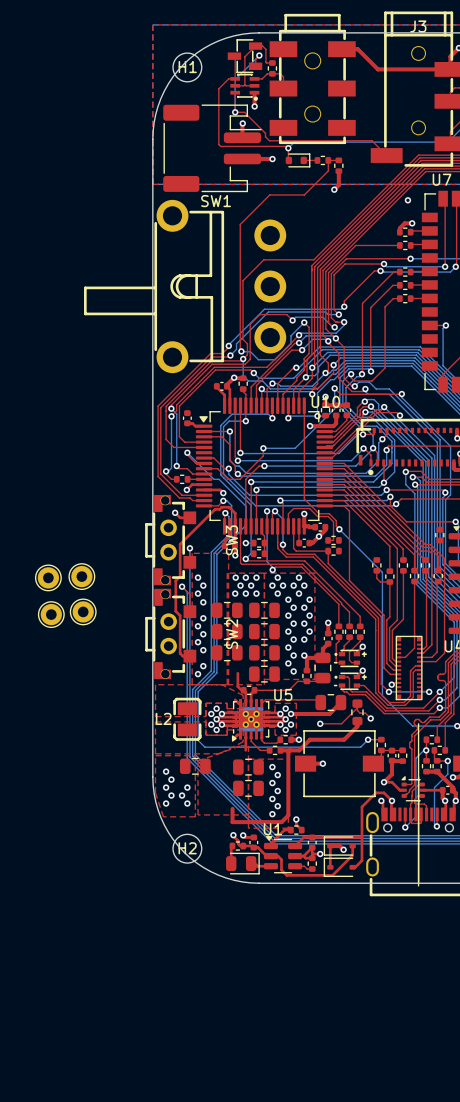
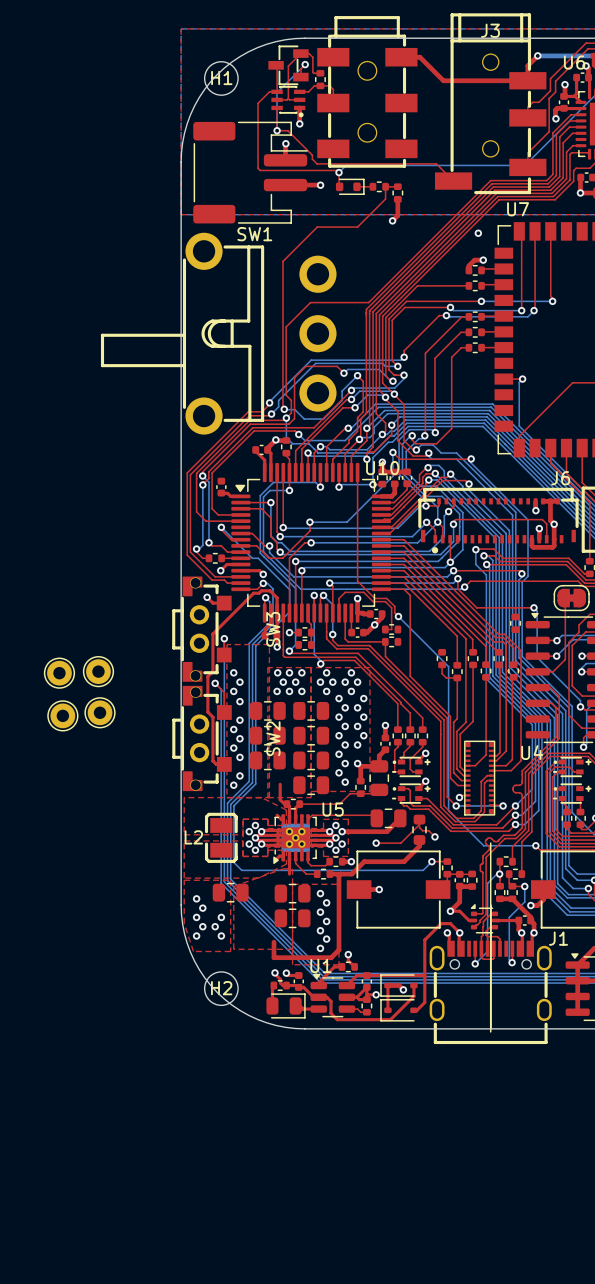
top track: (310, 426) (324, 426) -> none
via: (310, 426) -> none

